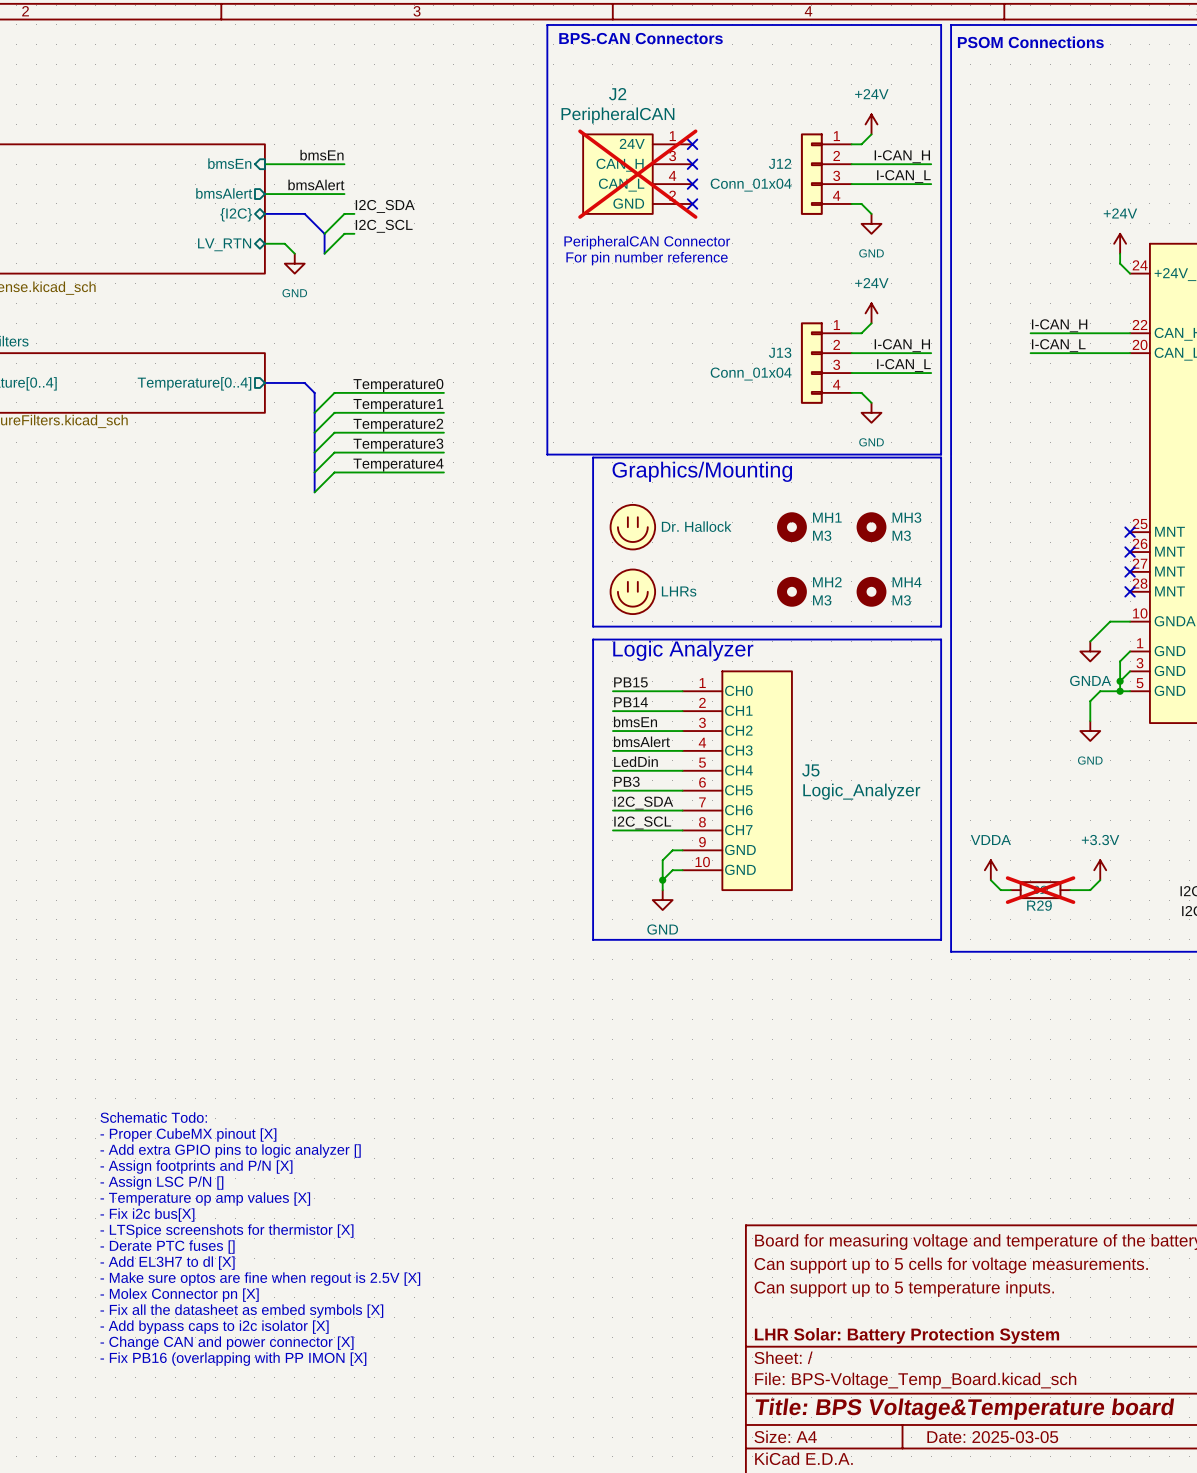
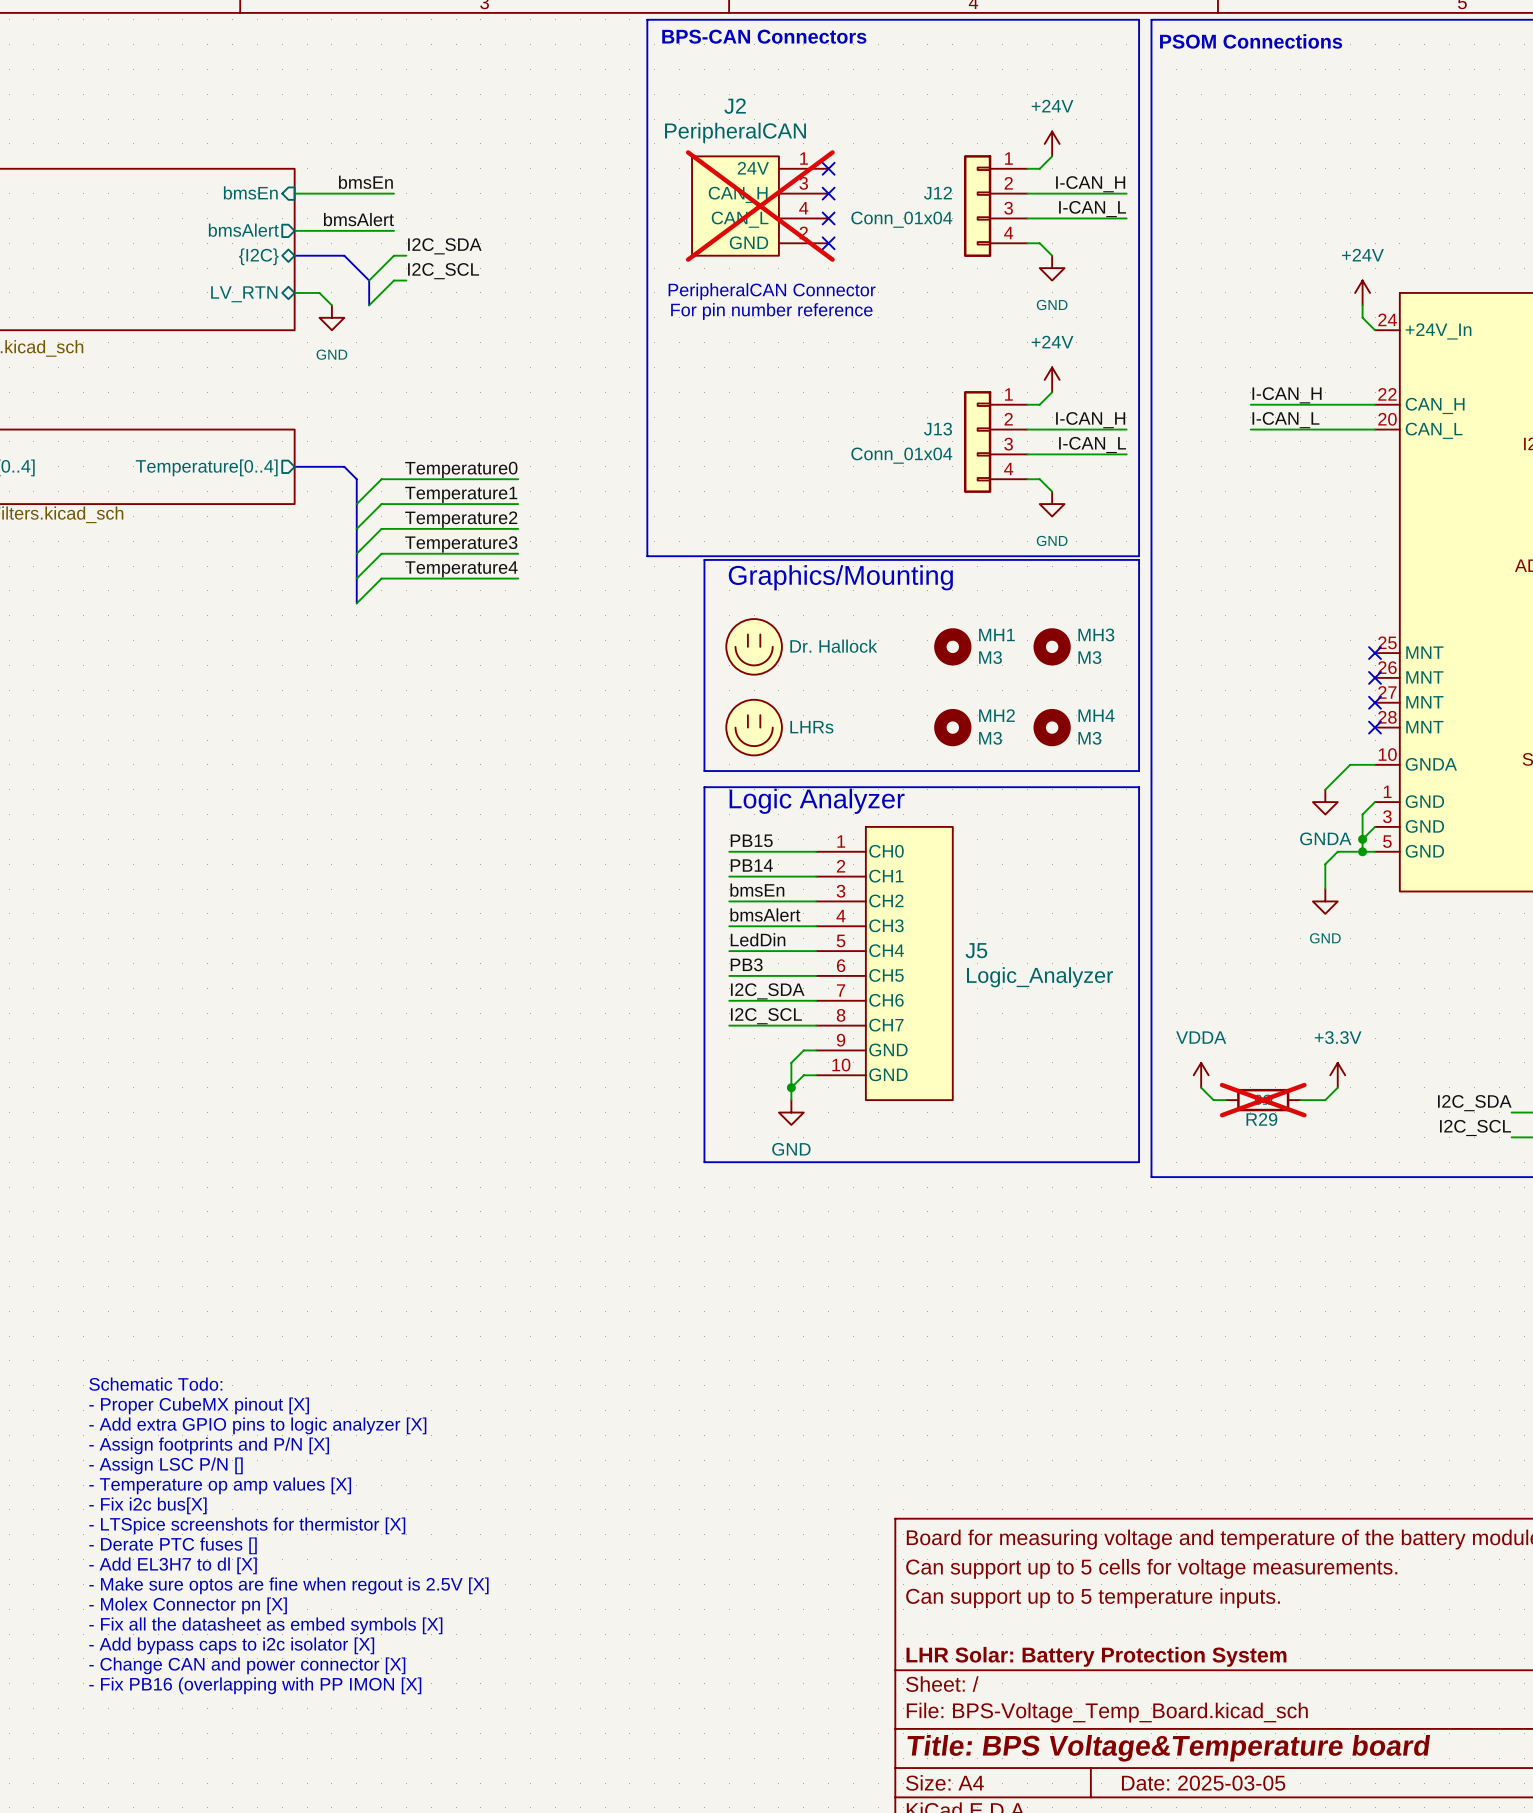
text: - Add extra GPIO pins to logic analyzer [] (230, 1151) -> - Add extra GPIO pins to logic analyzer [X] (257, 1425)

